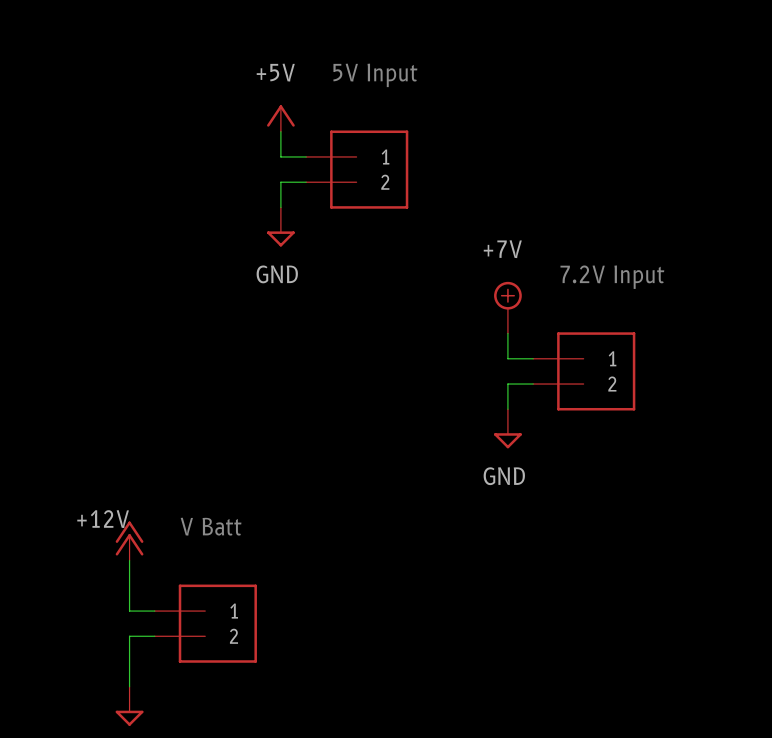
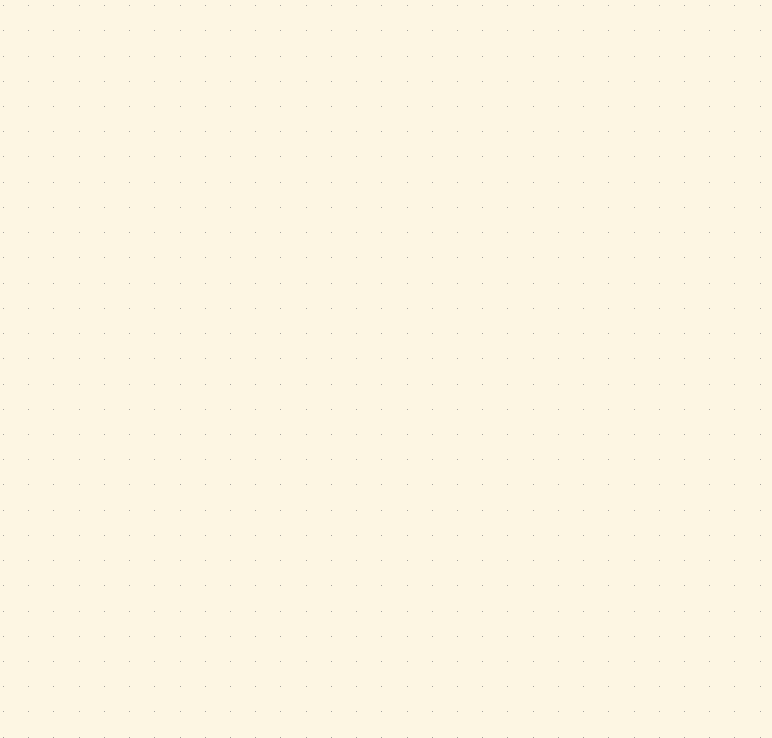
text: 5V Input (375, 75) -> none
power symbol: +5V (280, 118) -> none
wire: (280, 131) (280, 156) (306, 156) -> none
part: (357, 169) -> none
wire: (306, 182) (280, 182) (280, 207) -> none
power symbol: GND (280, 226) -> none
text: 7.2V Input (612, 277) -> none
power symbol: +7V (507, 307) -> none
wire: (507, 333) (507, 358) (533, 358) -> none
part: (584, 371) -> none
wire: (533, 384) (507, 384) (507, 409) -> none
power symbol: GND (507, 428) -> none
text: V Batt (211, 526) -> none
power symbol: +12V (129, 541) -> none
wire: (129, 560) (129, 611) (154, 611) -> none
part: (205, 623) -> none
wire: (154, 636) (129, 636) (129, 686) -> none
power symbol: (129, 706) -> none

